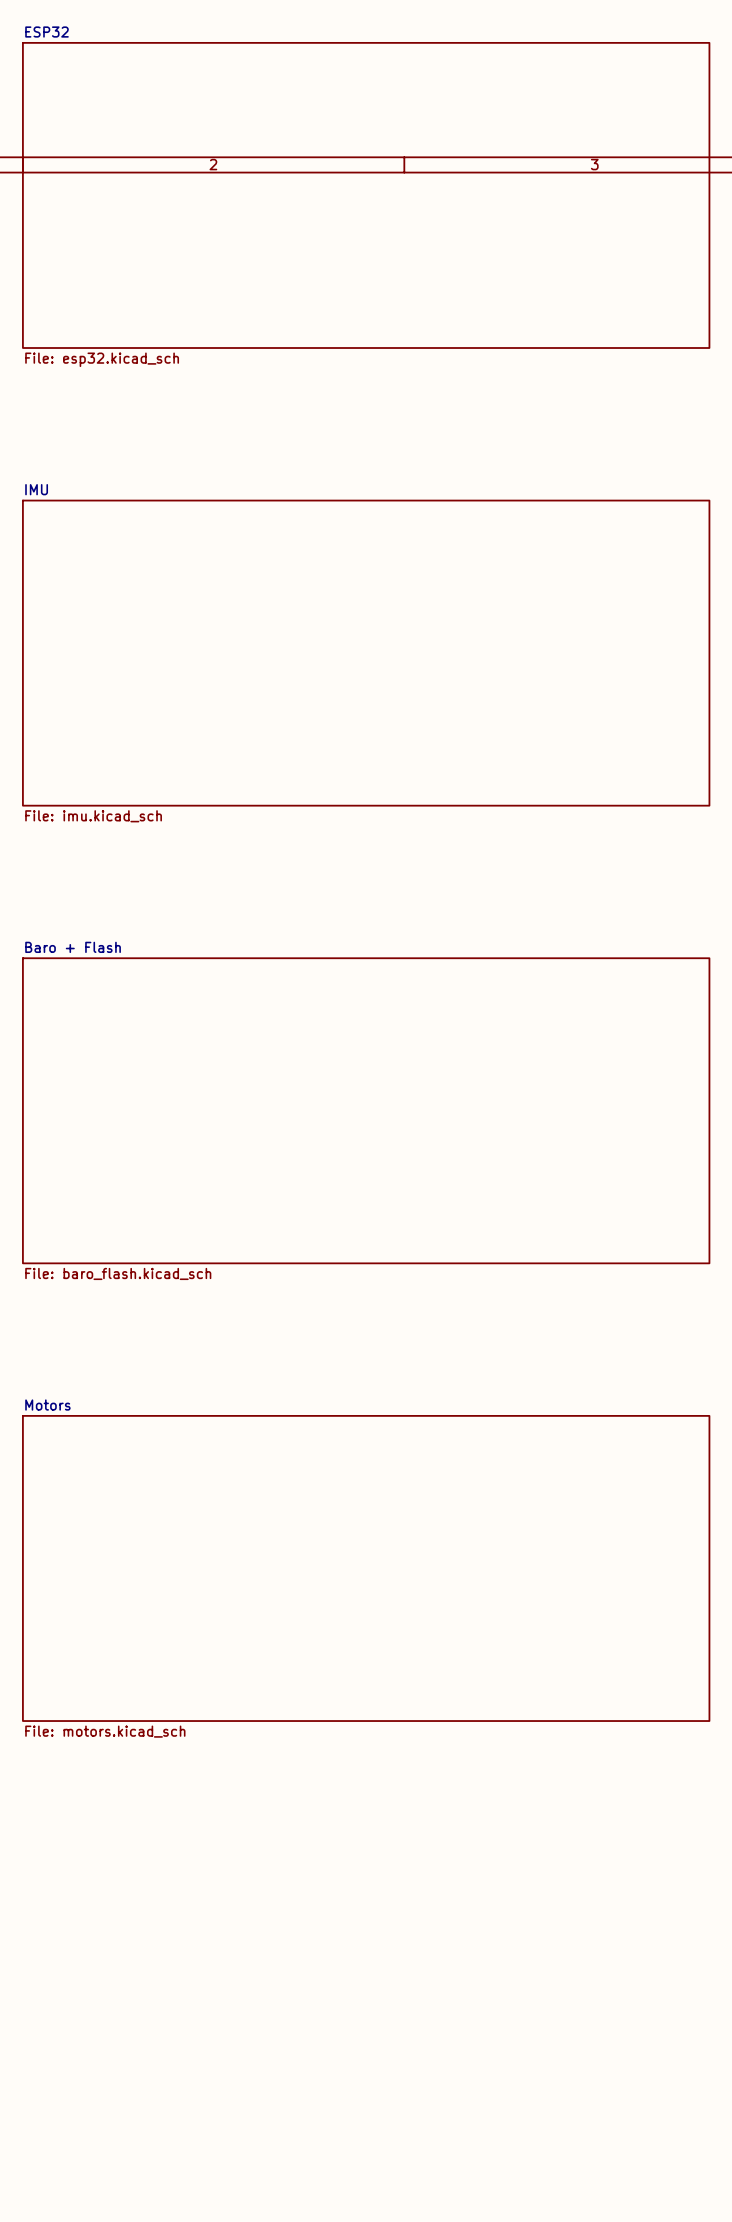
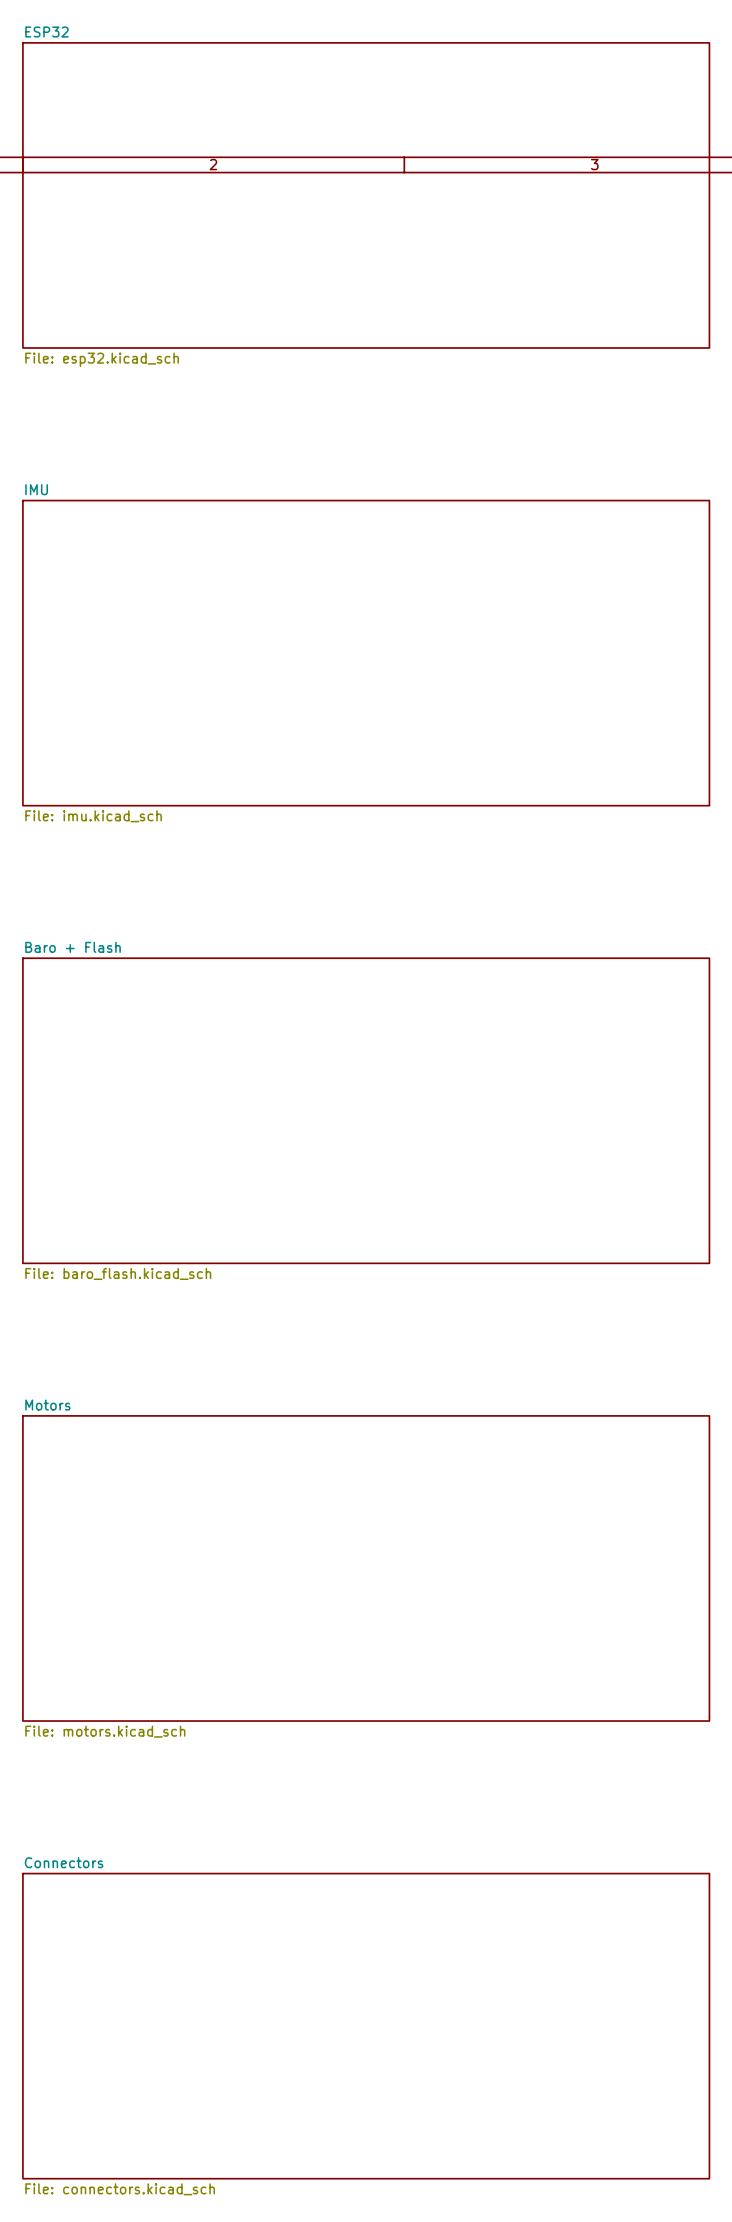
sheet Connectors: none -> File: connectors.kicad_sch (366, 2026)

